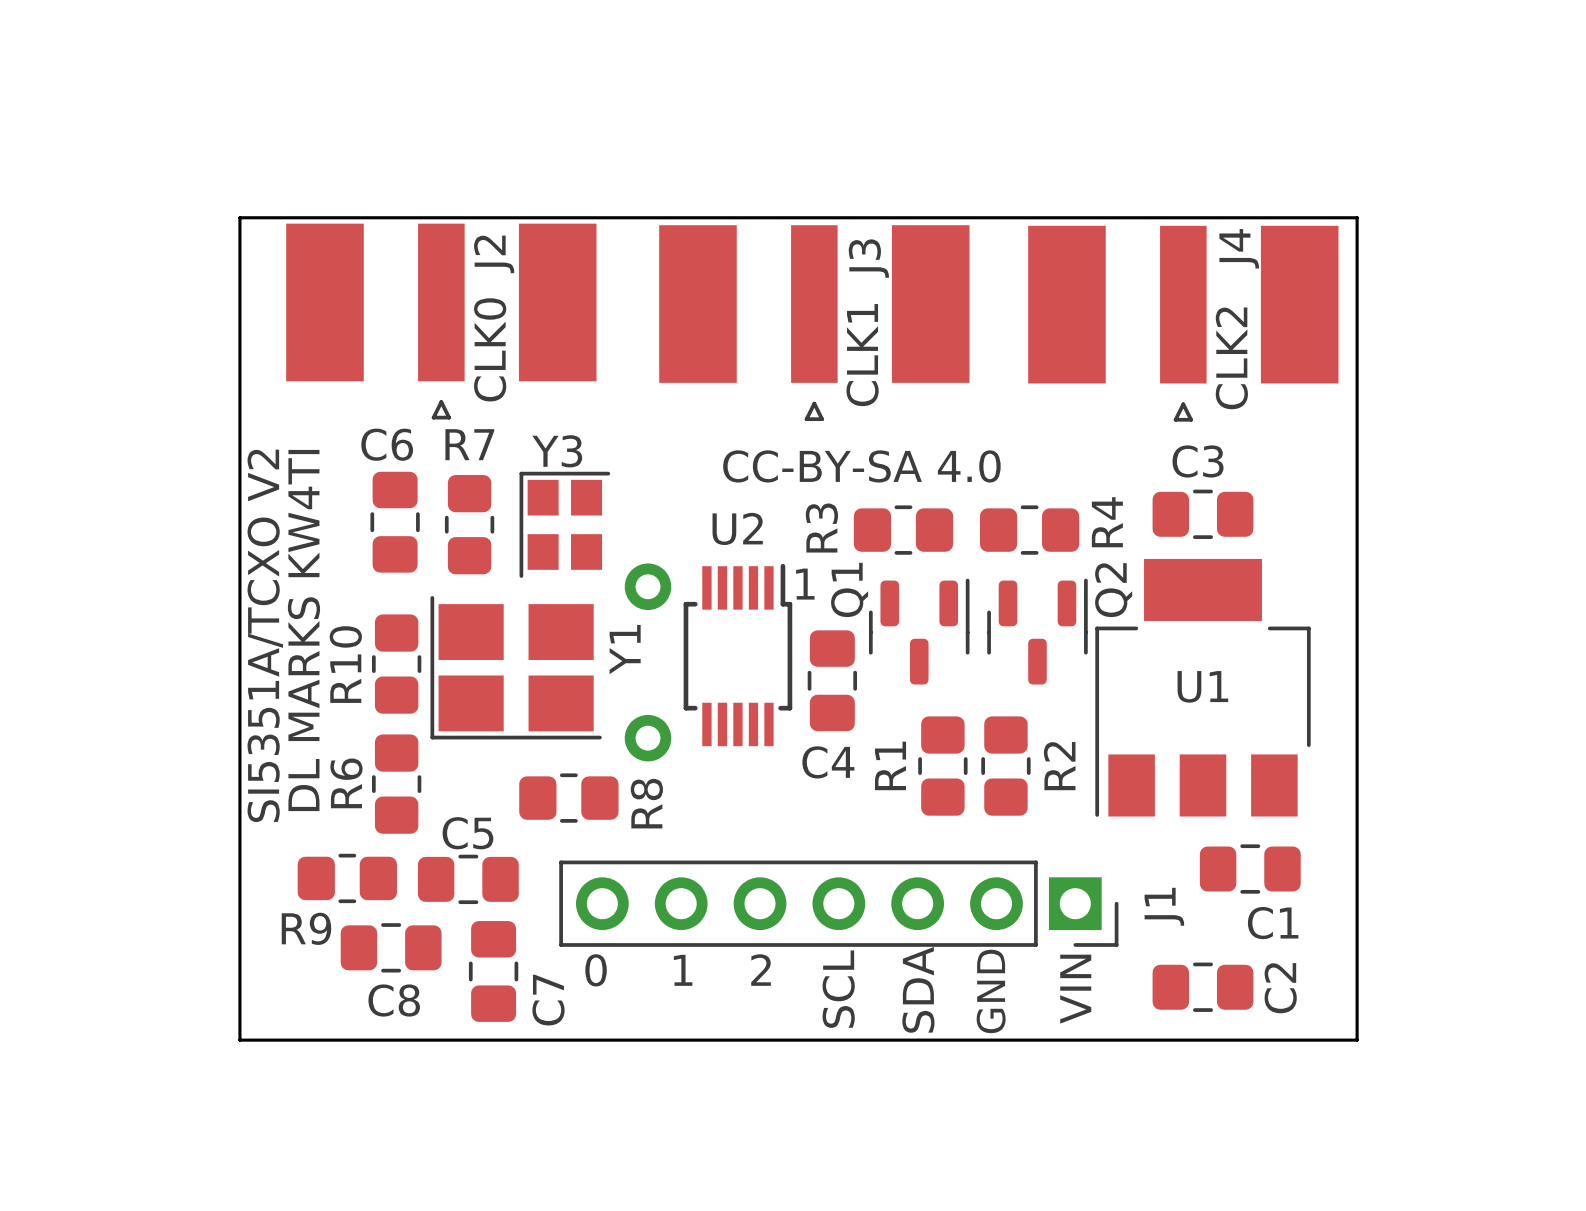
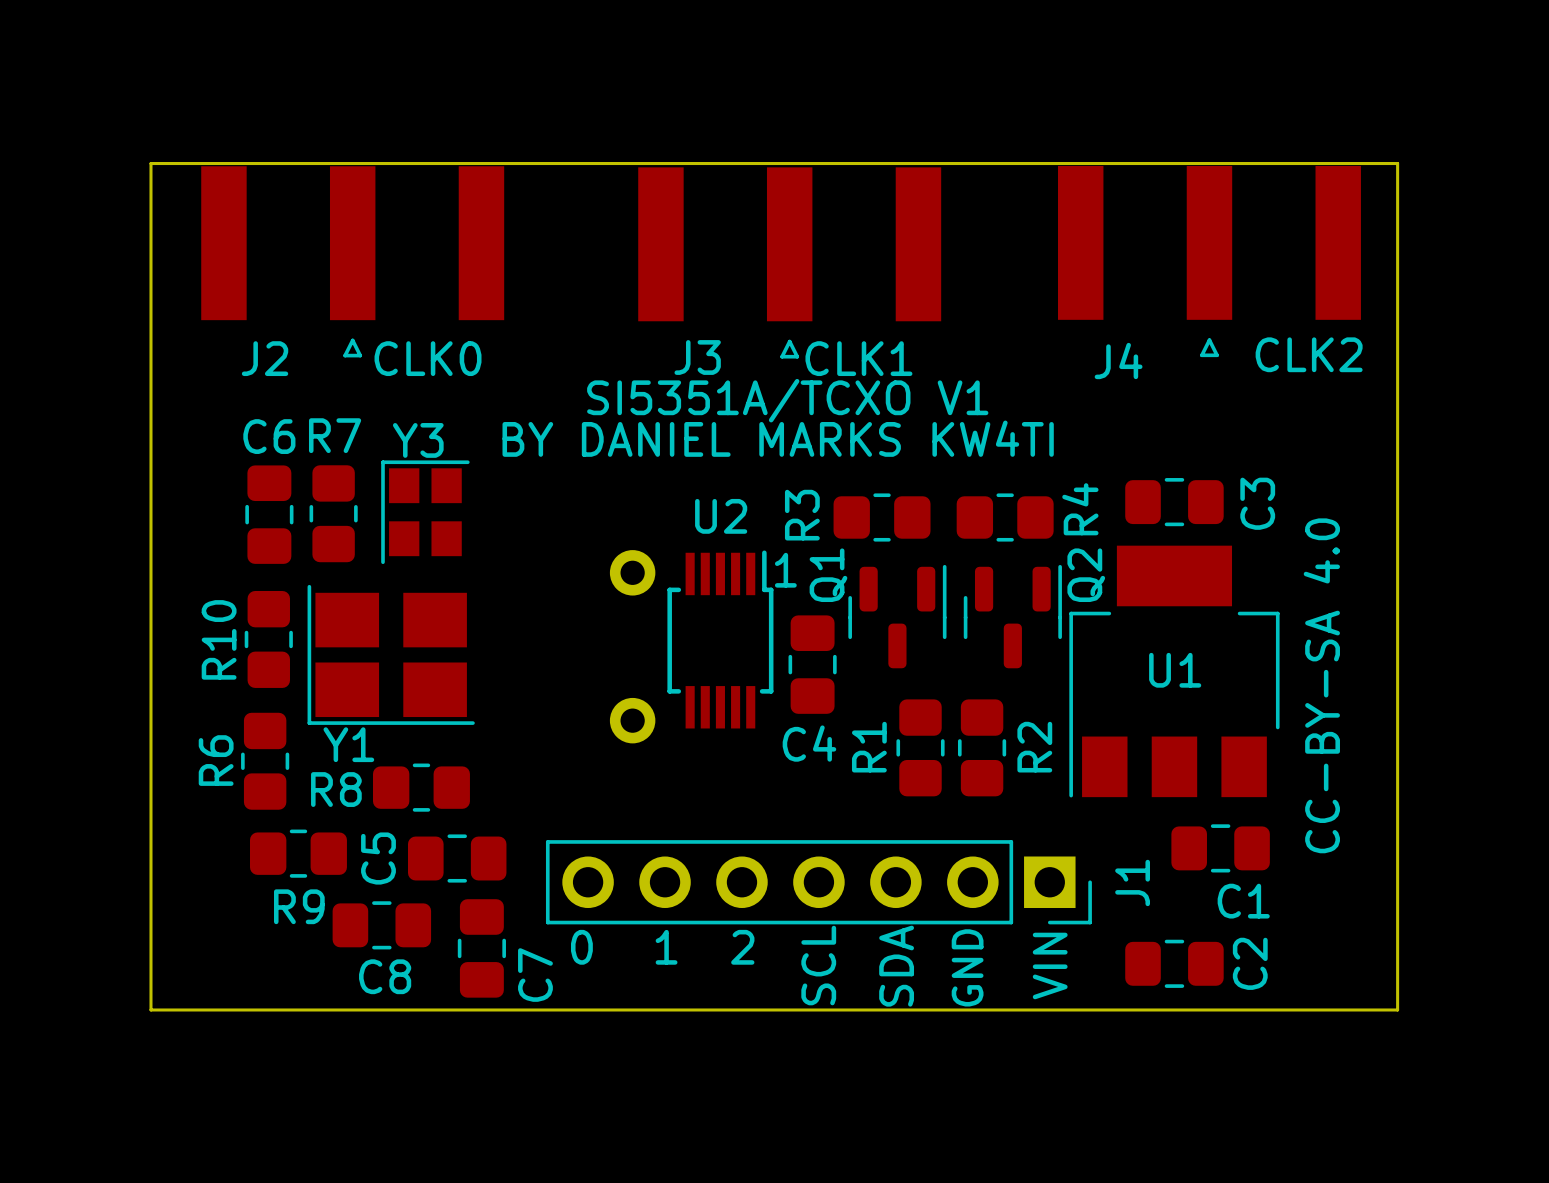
board edge: (239, 217) (239, 1040) (1357, 1040) (1357, 217) (239, 217) -> (150, 163) (150, 1009) (1397, 1009) (1397, 163) (150, 163)
J2 footprint: [286, 223, 597, 420] -> [201, 166, 505, 358]
J3 footprint: [659, 225, 970, 422] -> [638, 167, 942, 359]
J4 footprint: [1028, 225, 1339, 422] -> [1057, 165, 1361, 358]
J4 name position: J4 (1239, 248) -> J4 (1118, 361)
J2 name position: J2 (494, 254) -> J2 (265, 358)
J3 name position: J3 (868, 258) -> J3 (697, 357)
text rotation: 0° (490, 349) -> 90° clockwise (428, 358)
text rotation: 0° (862, 355) -> 90° clockwise (858, 358)
text rotation: 0° (1231, 358) -> 90° clockwise (1309, 354)
text: none -> SI5351A/TCXO V1 (787, 400)
C6 name position: C6 (387, 444) -> C6 (269, 436)
text: none -> BY DANIEL MARKS KW4TI (778, 438)
C3 name rotation: 0° (1198, 461) -> 90° counterclockwise (1257, 503)
C3 name position: C3 (1198, 461) -> C3 (1257, 503)
text rotation: 0° (861, 466) -> 90° counterclockwise (1321, 685)
text position: CC-BY-SA 4.0 (861, 466) -> CC-BY-SA 4.0 (1321, 685)
C6 position: (395, 522) -> (269, 514)
R7 position: (469, 524) -> (333, 513)
Y3 position: (564, 524) -> (425, 512)
text: DL MARKS KW4TI (303, 630) -> none
text: SI5351A/TCXO V2 (265, 635) -> none
Y1 name rotation: 0° (625, 649) -> 90° clockwise (348, 744)
Y1 name position: Y1 (625, 649) -> Y1 (348, 744)
R10 position: (396, 664) -> (268, 639)
Y1 position: (516, 667) -> (391, 654)
R6 position: (396, 784) -> (265, 761)
R8 position: (568, 798) -> (421, 787)
R8 name rotation: 0° (646, 803) -> 90° clockwise (336, 789)
R8 name position: R8 (646, 803) -> R8 (336, 789)
C5 name rotation: 0° (467, 833) -> 90° counterclockwise (378, 858)
C5 name position: C5 (467, 833) -> C5 (378, 858)
R9 position: (347, 878) -> (298, 853)

